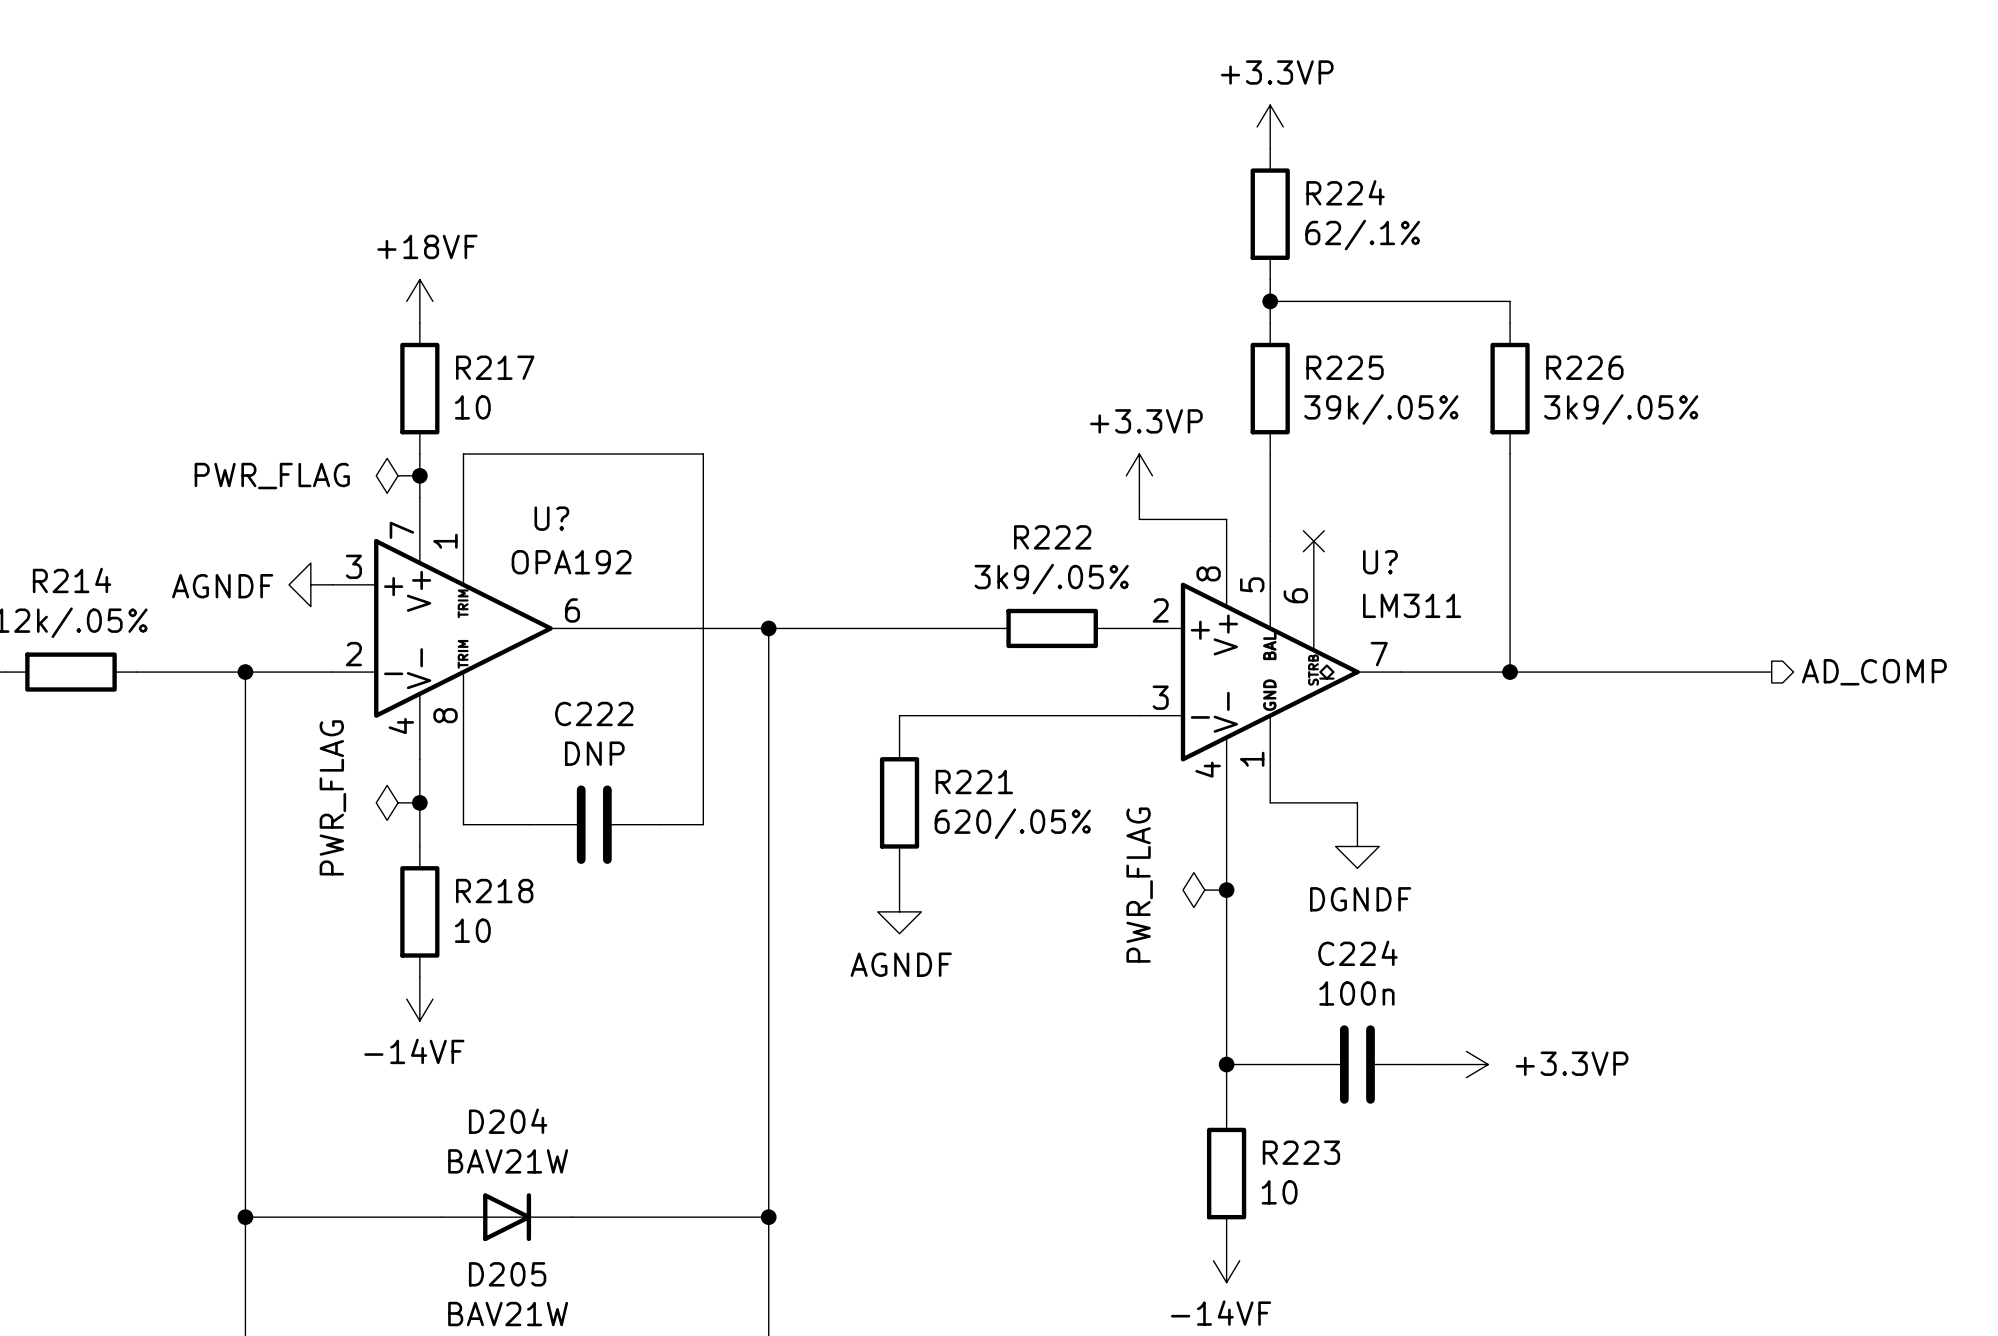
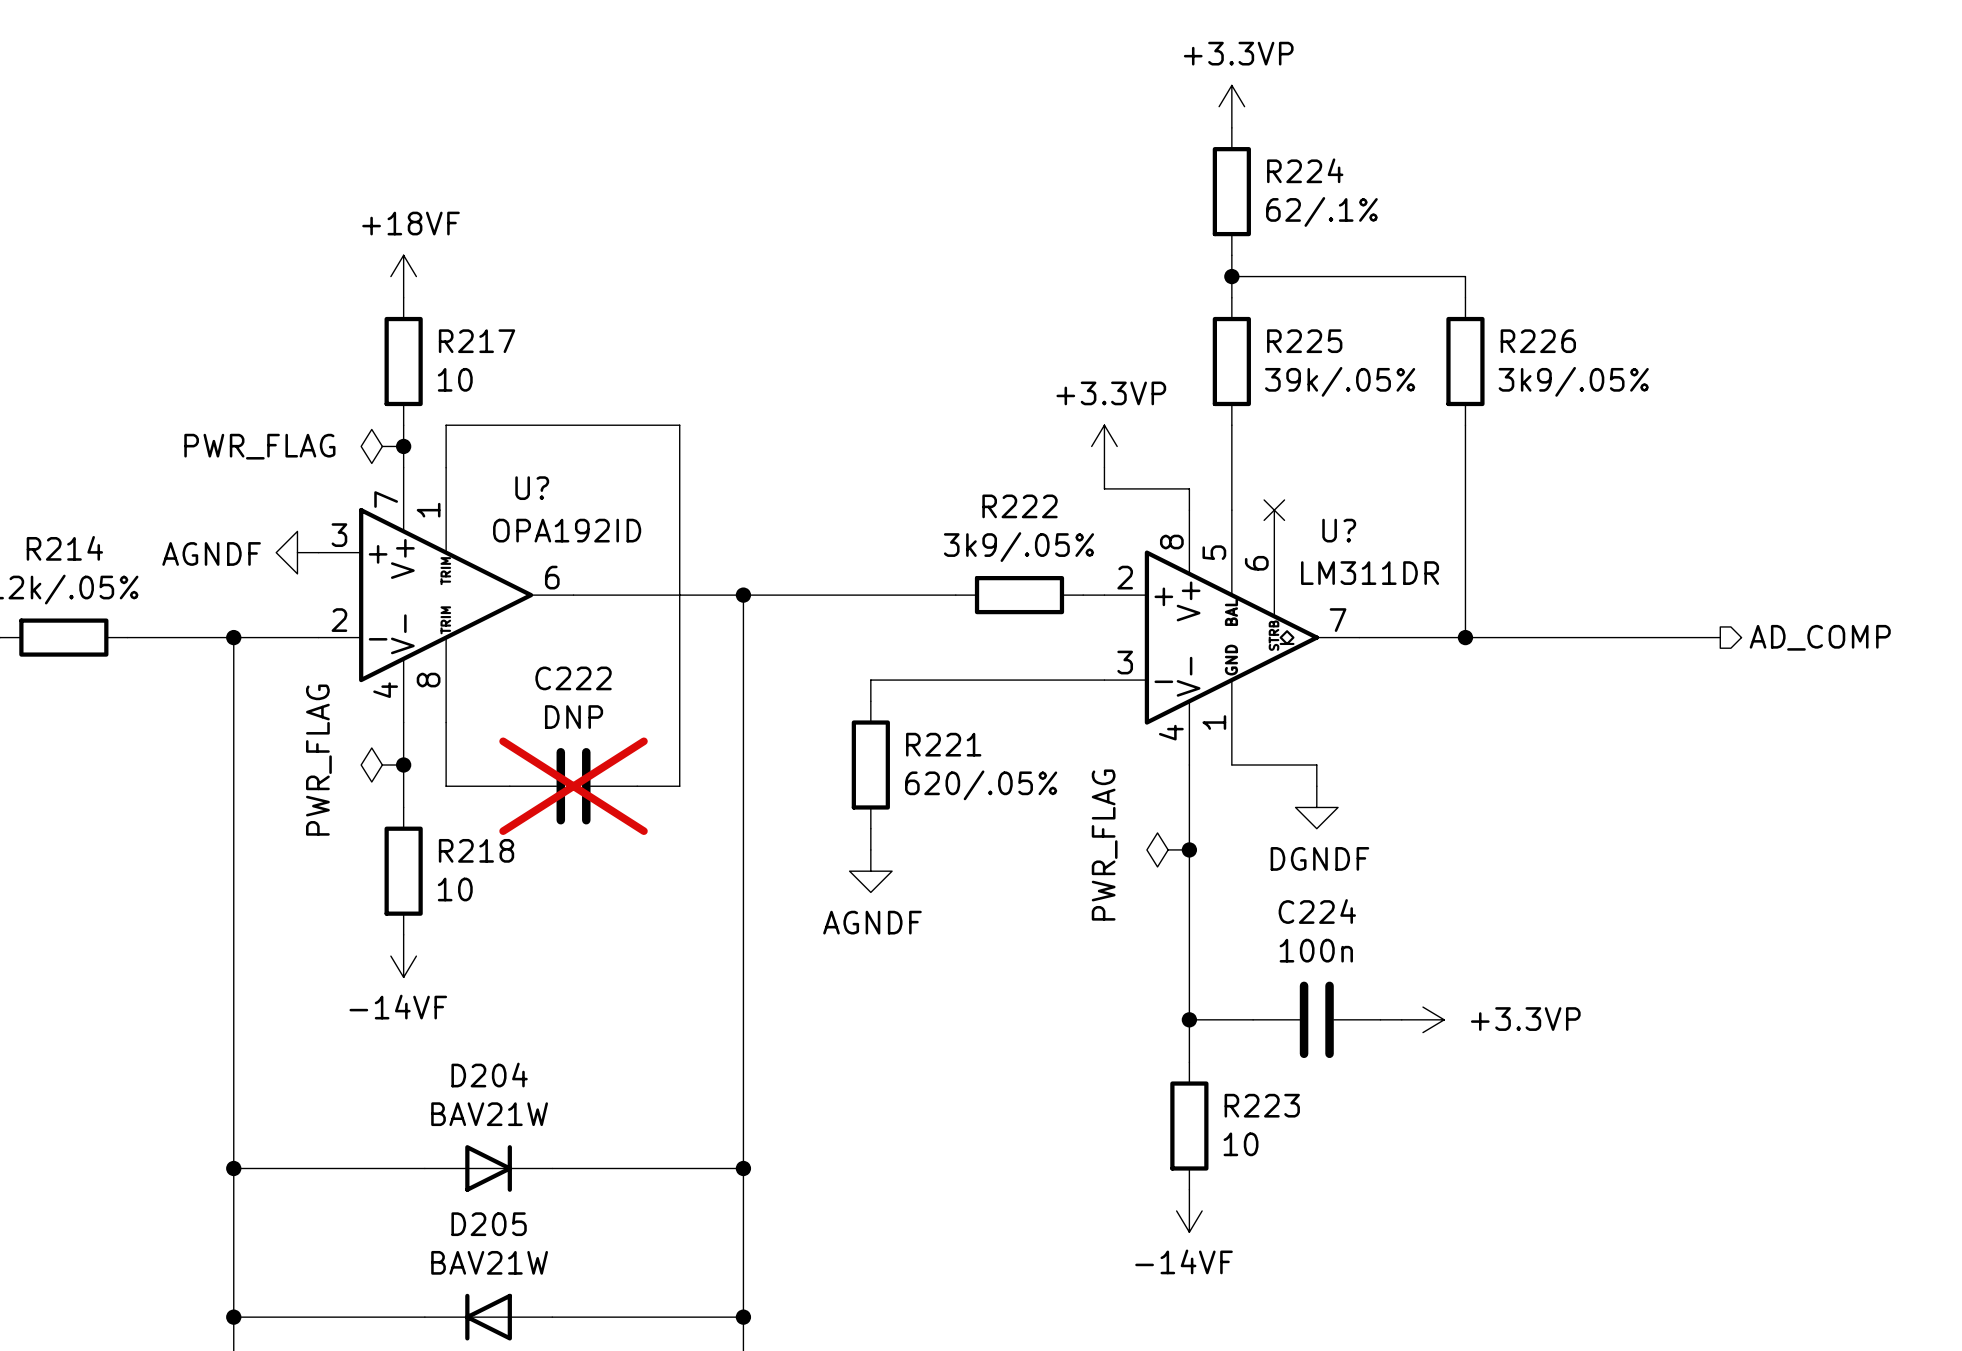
U? value: OPA192 (571, 562) -> OPA192ID (567, 530)
U? value: LM311 (1412, 605) -> LM311DR (1370, 573)
C222 do-not-place cross: none -> (573, 786)

